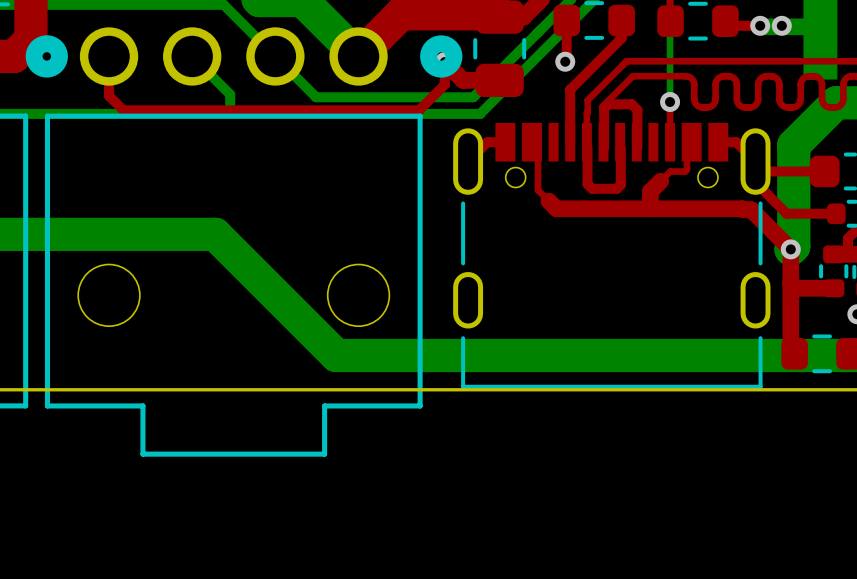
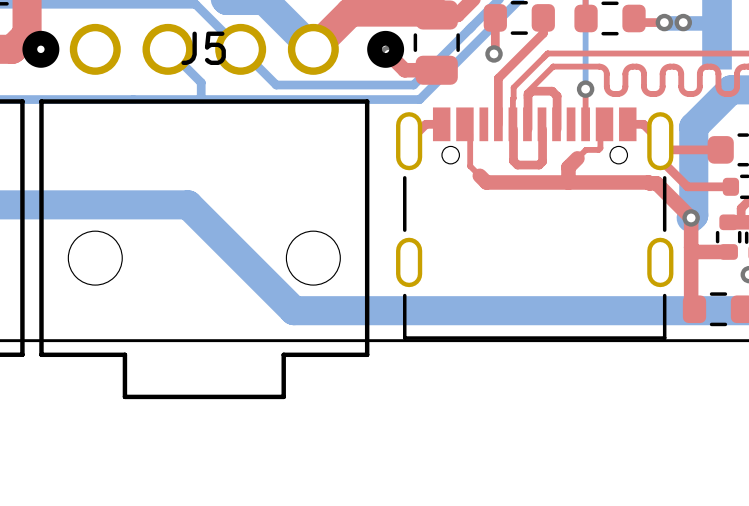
J5 name: none -> J5 (203, 48)
top track: (109, 56) (109, 95) (123, 110) (419, 110) (444, 84) (444, 62) -> none

